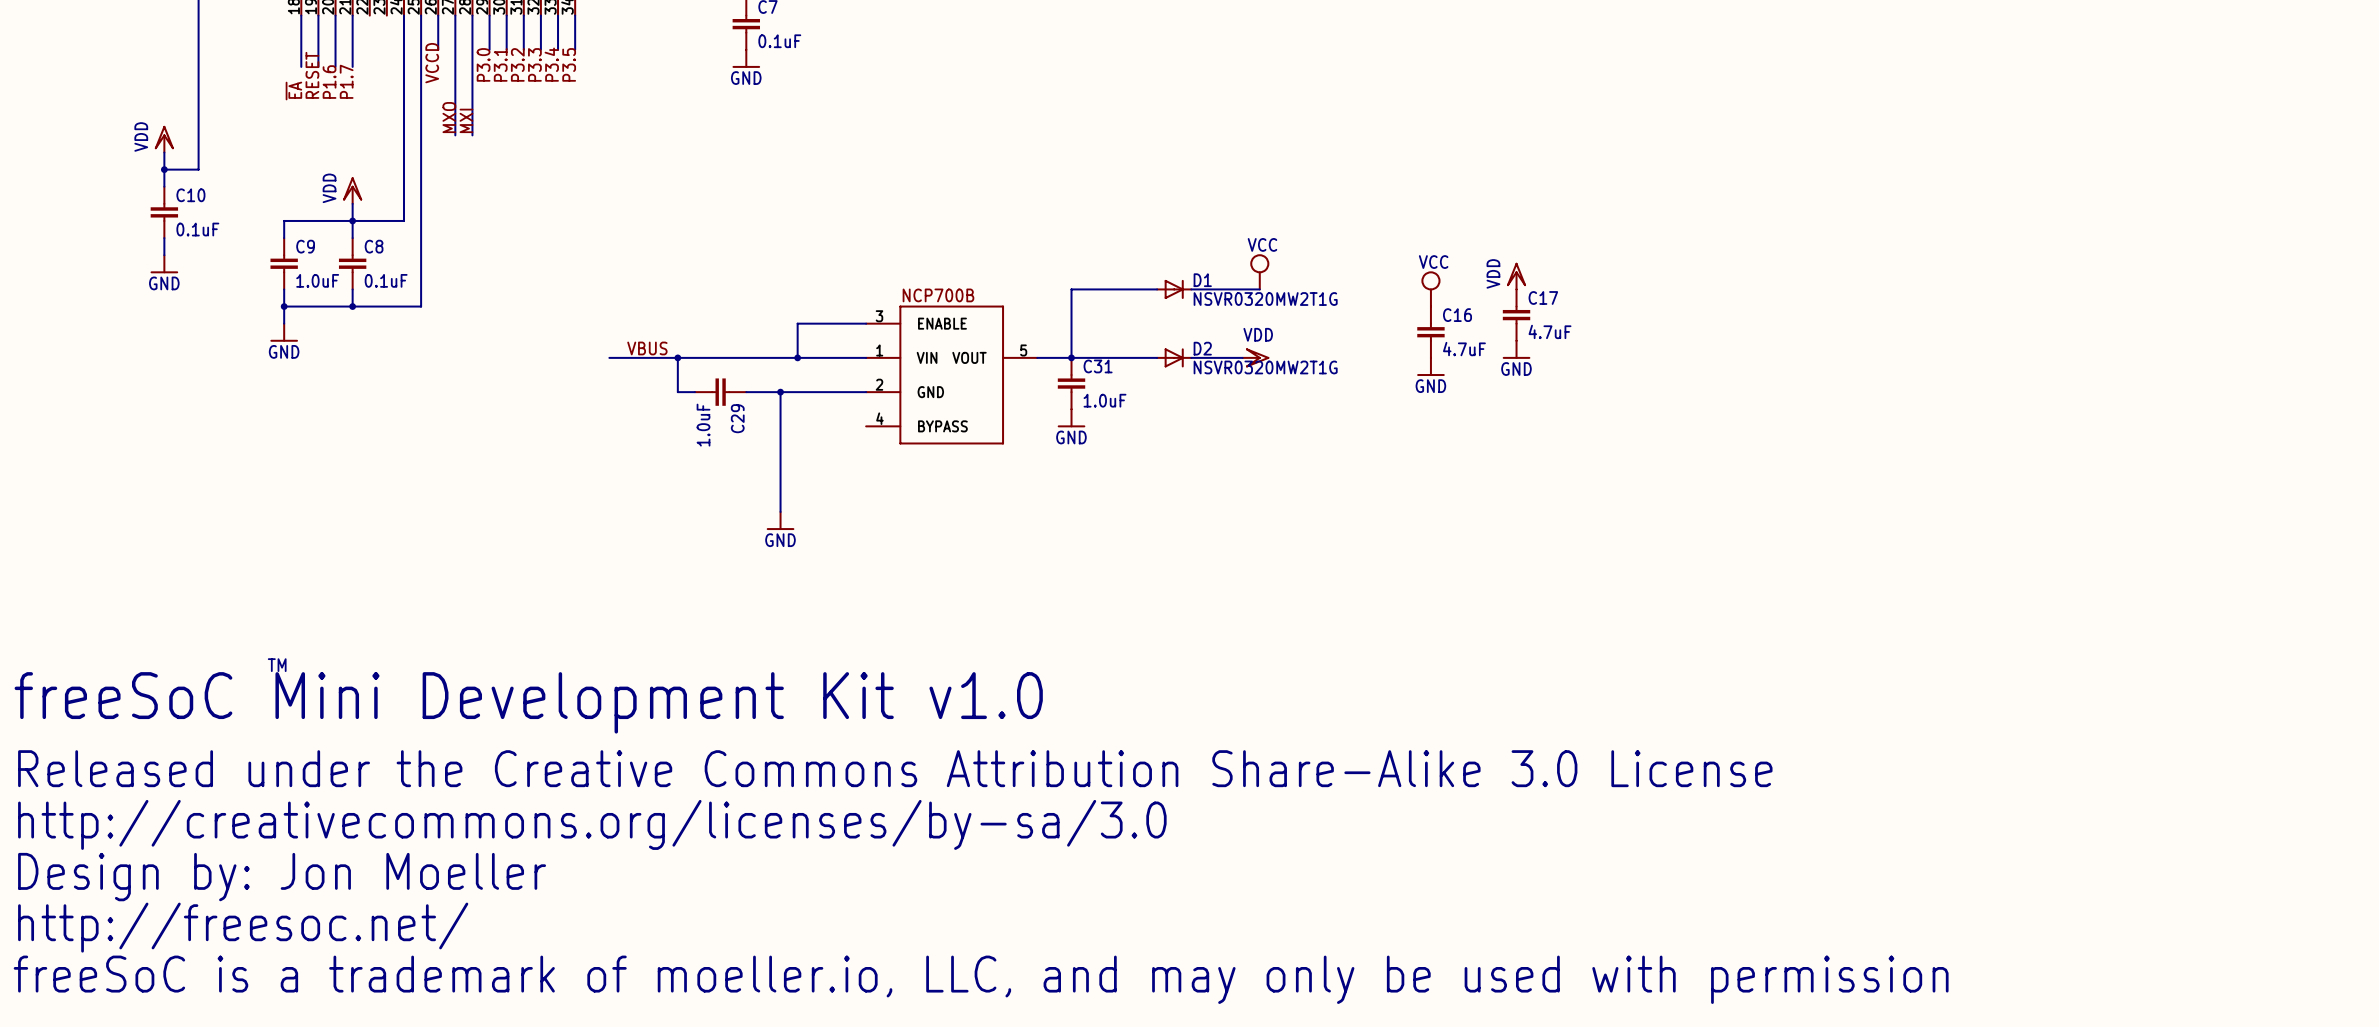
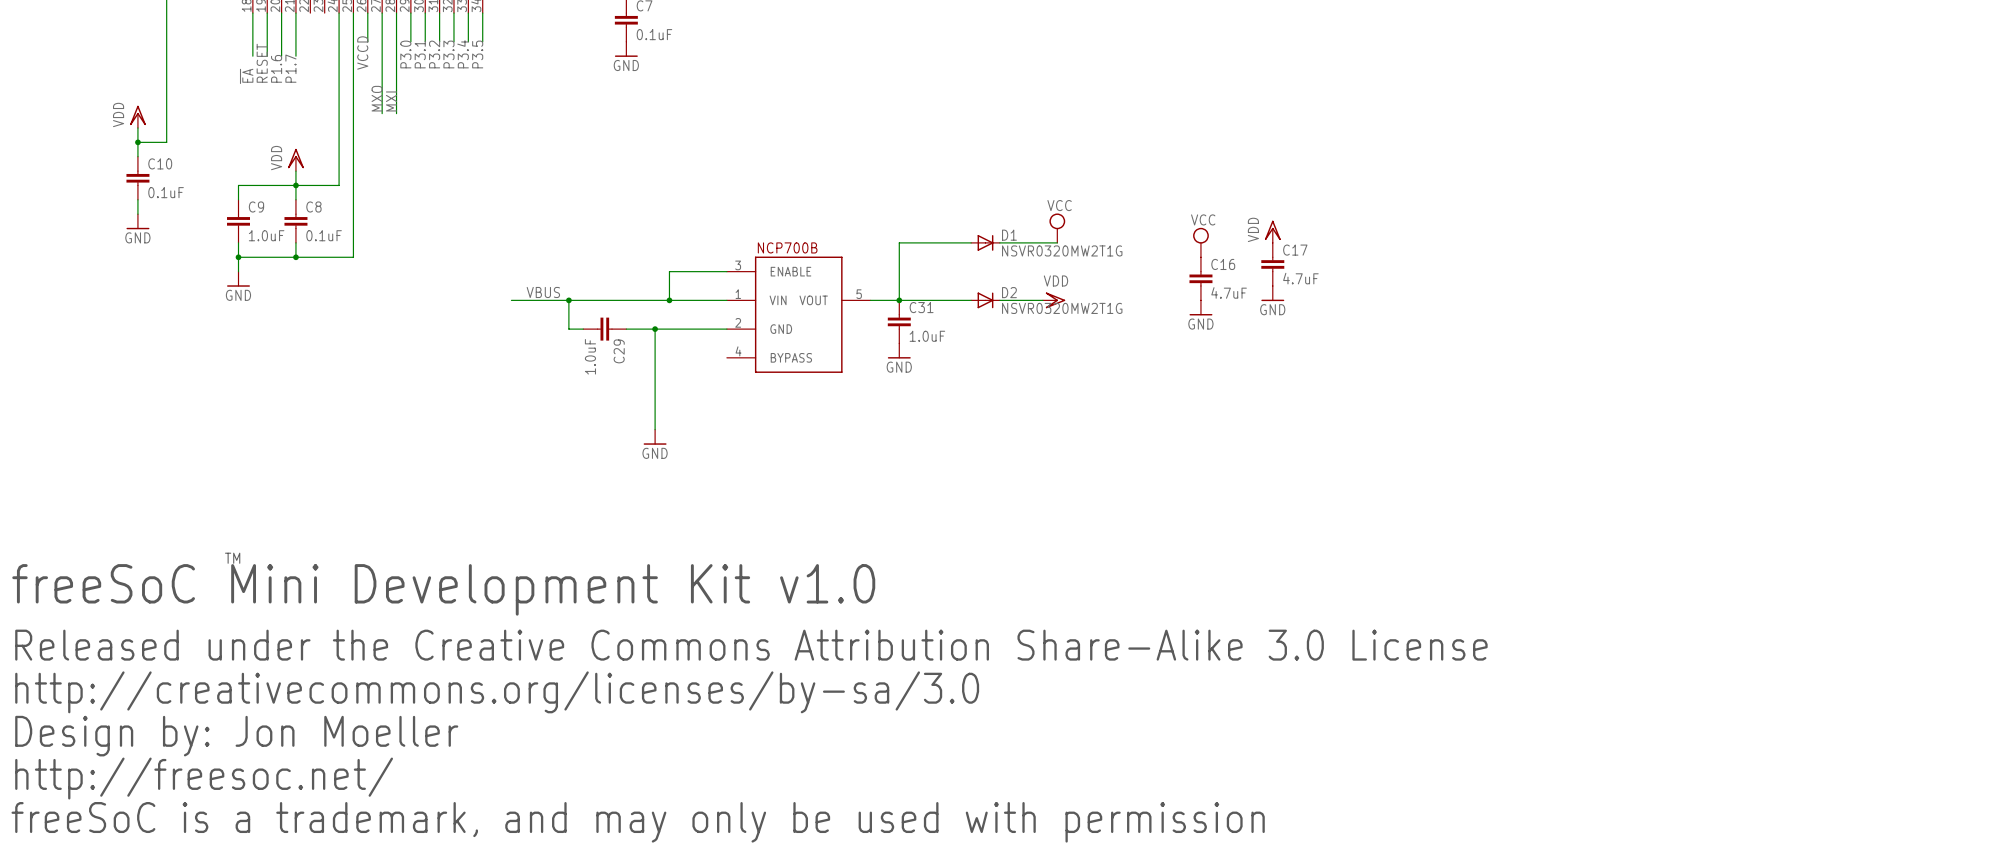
text: freeSoC is a trademark of moeller.io, LLC, and may only be used with permission (981, 979) -> freeSoC is a trademark, and may only be used with permission (638, 822)

